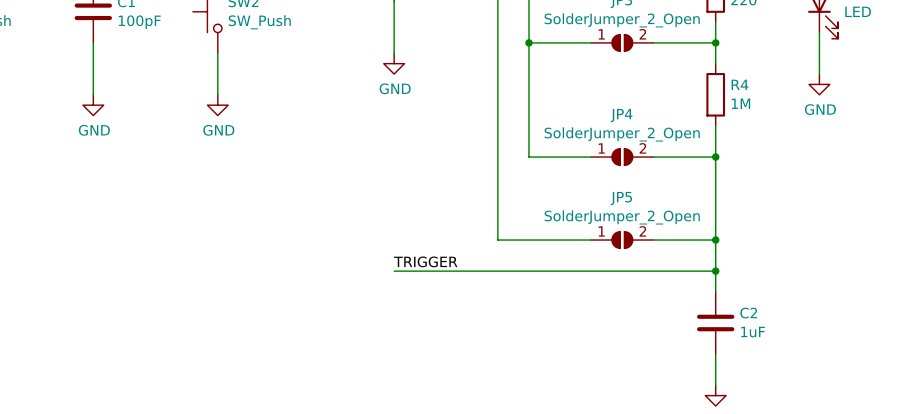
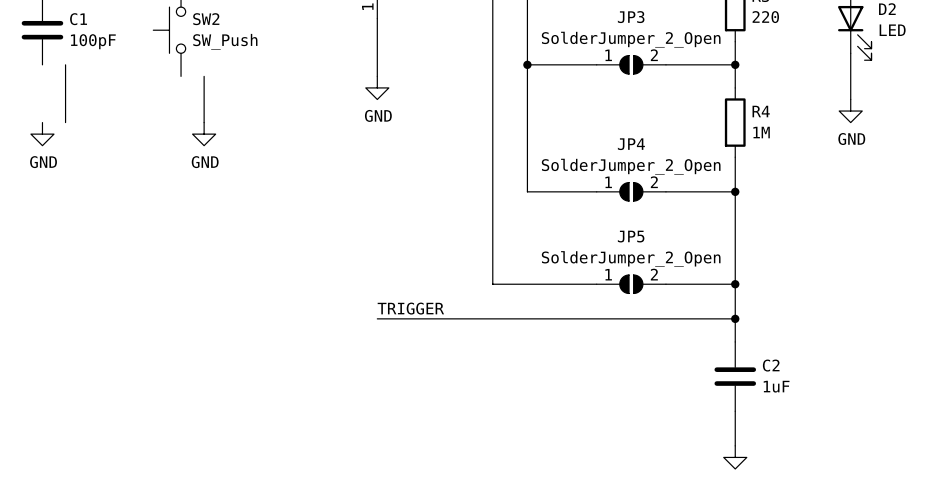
wire: (93, 42) (93, 94) -> (65, 64) (65, 122)
wire: (217, 53) (217, 94) -> (204, 76) (204, 122)
power symbol position: GND (217, 105) -> GND (204, 134)

